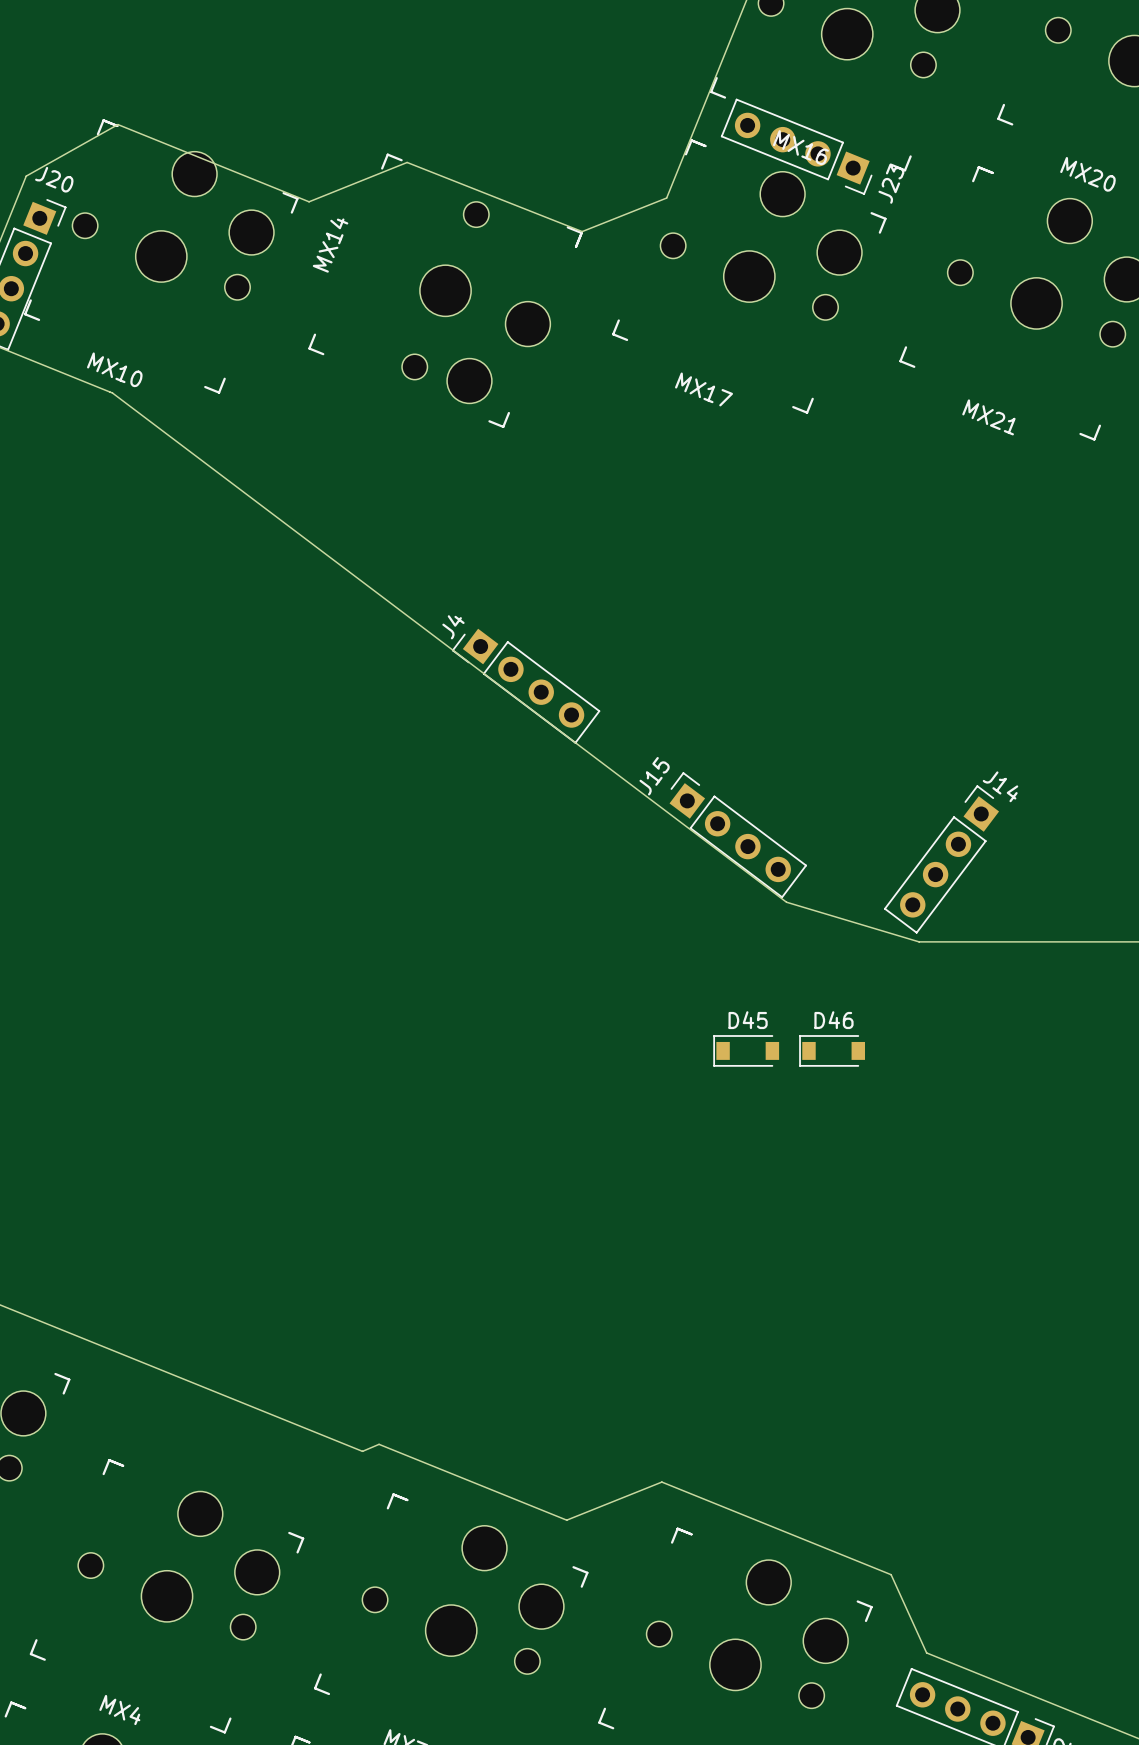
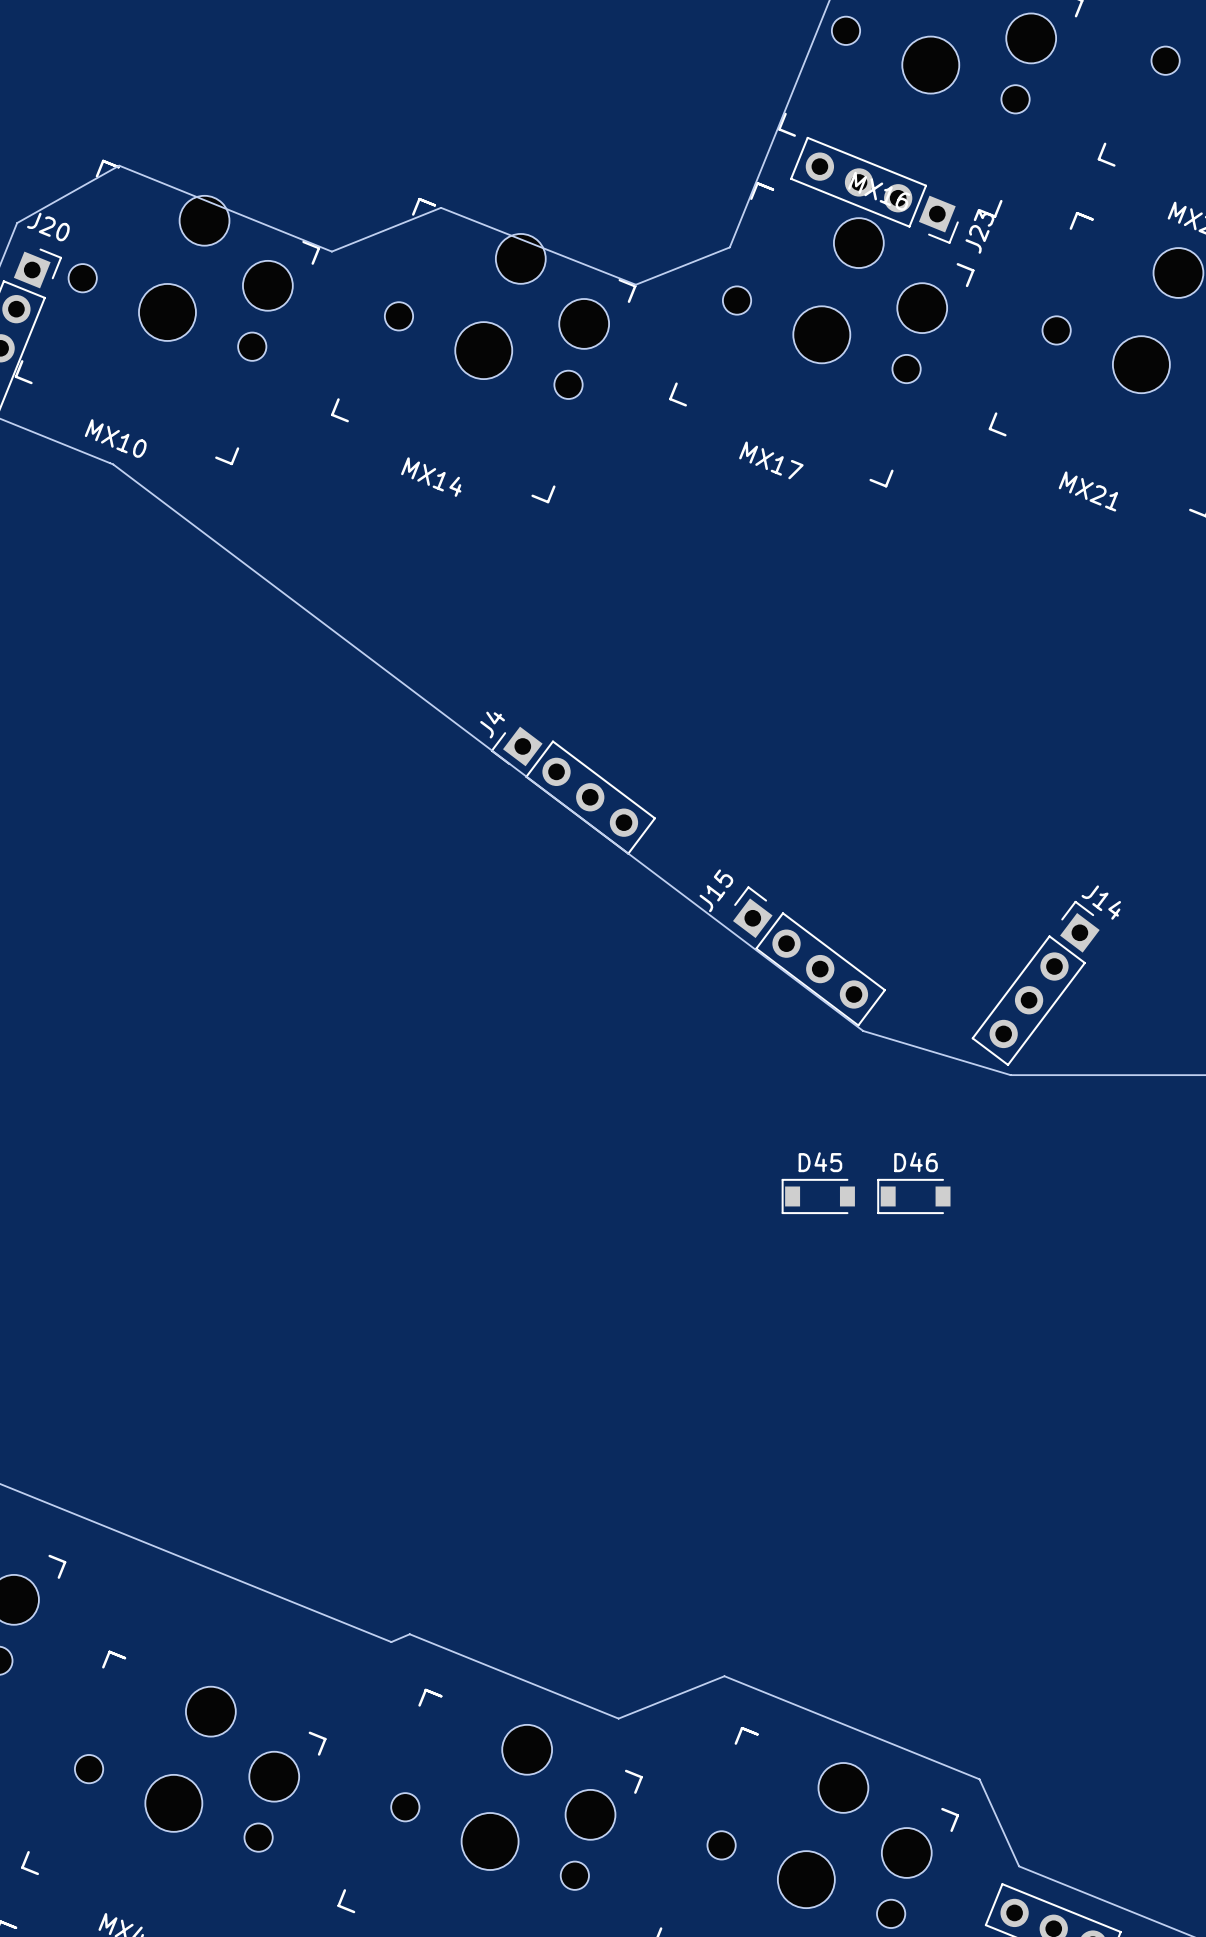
MX14 rotation: 0° (445, 290) -> 90° counterclockwise (483, 350)

